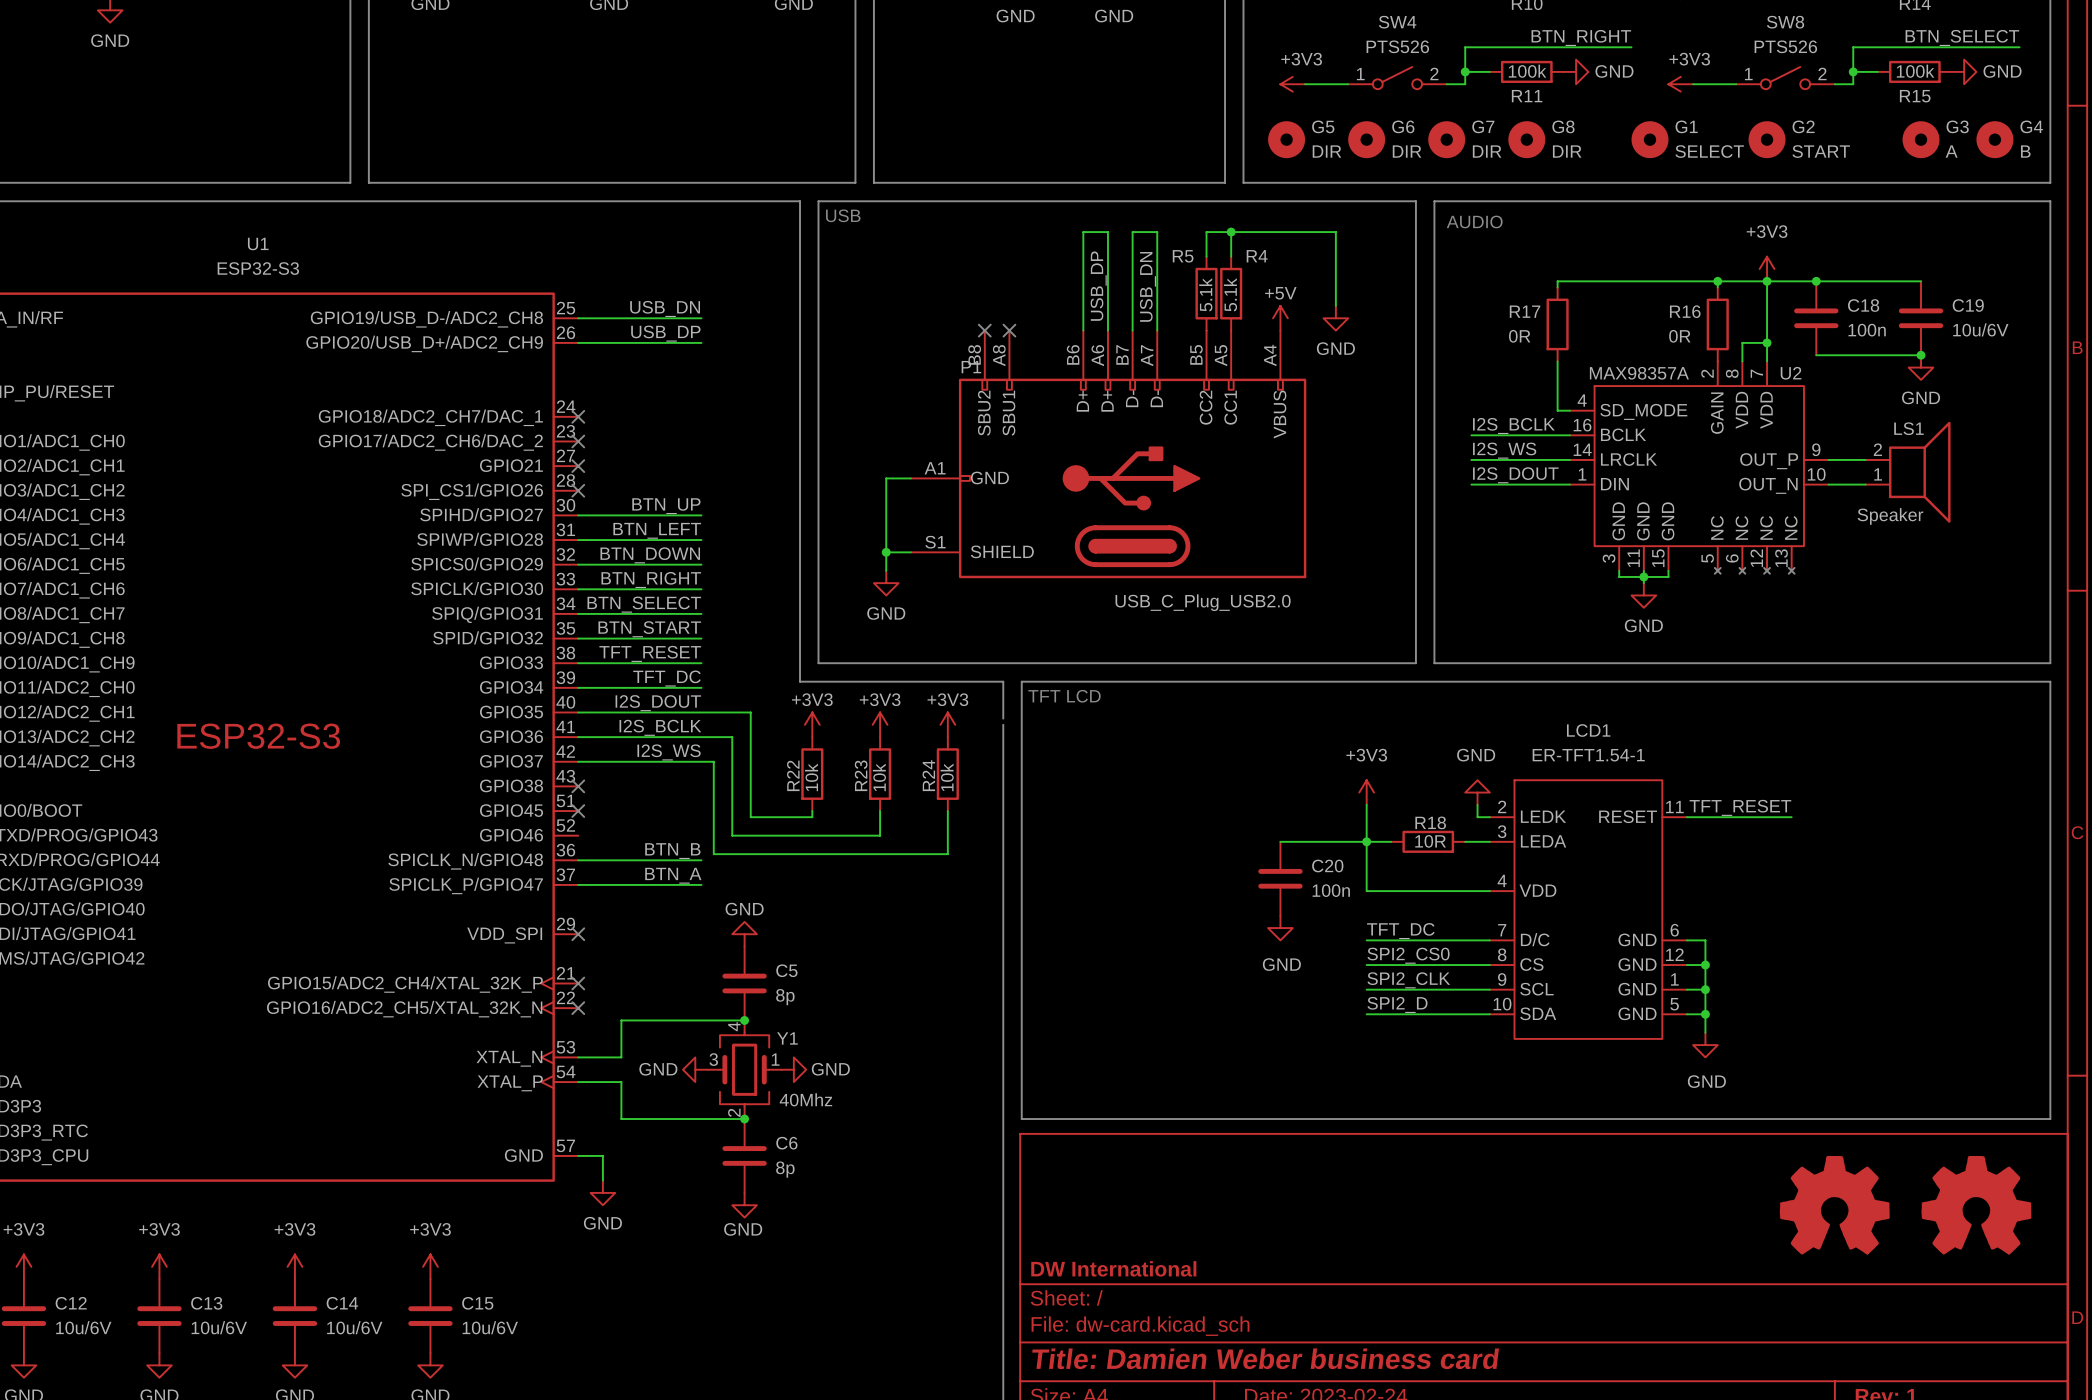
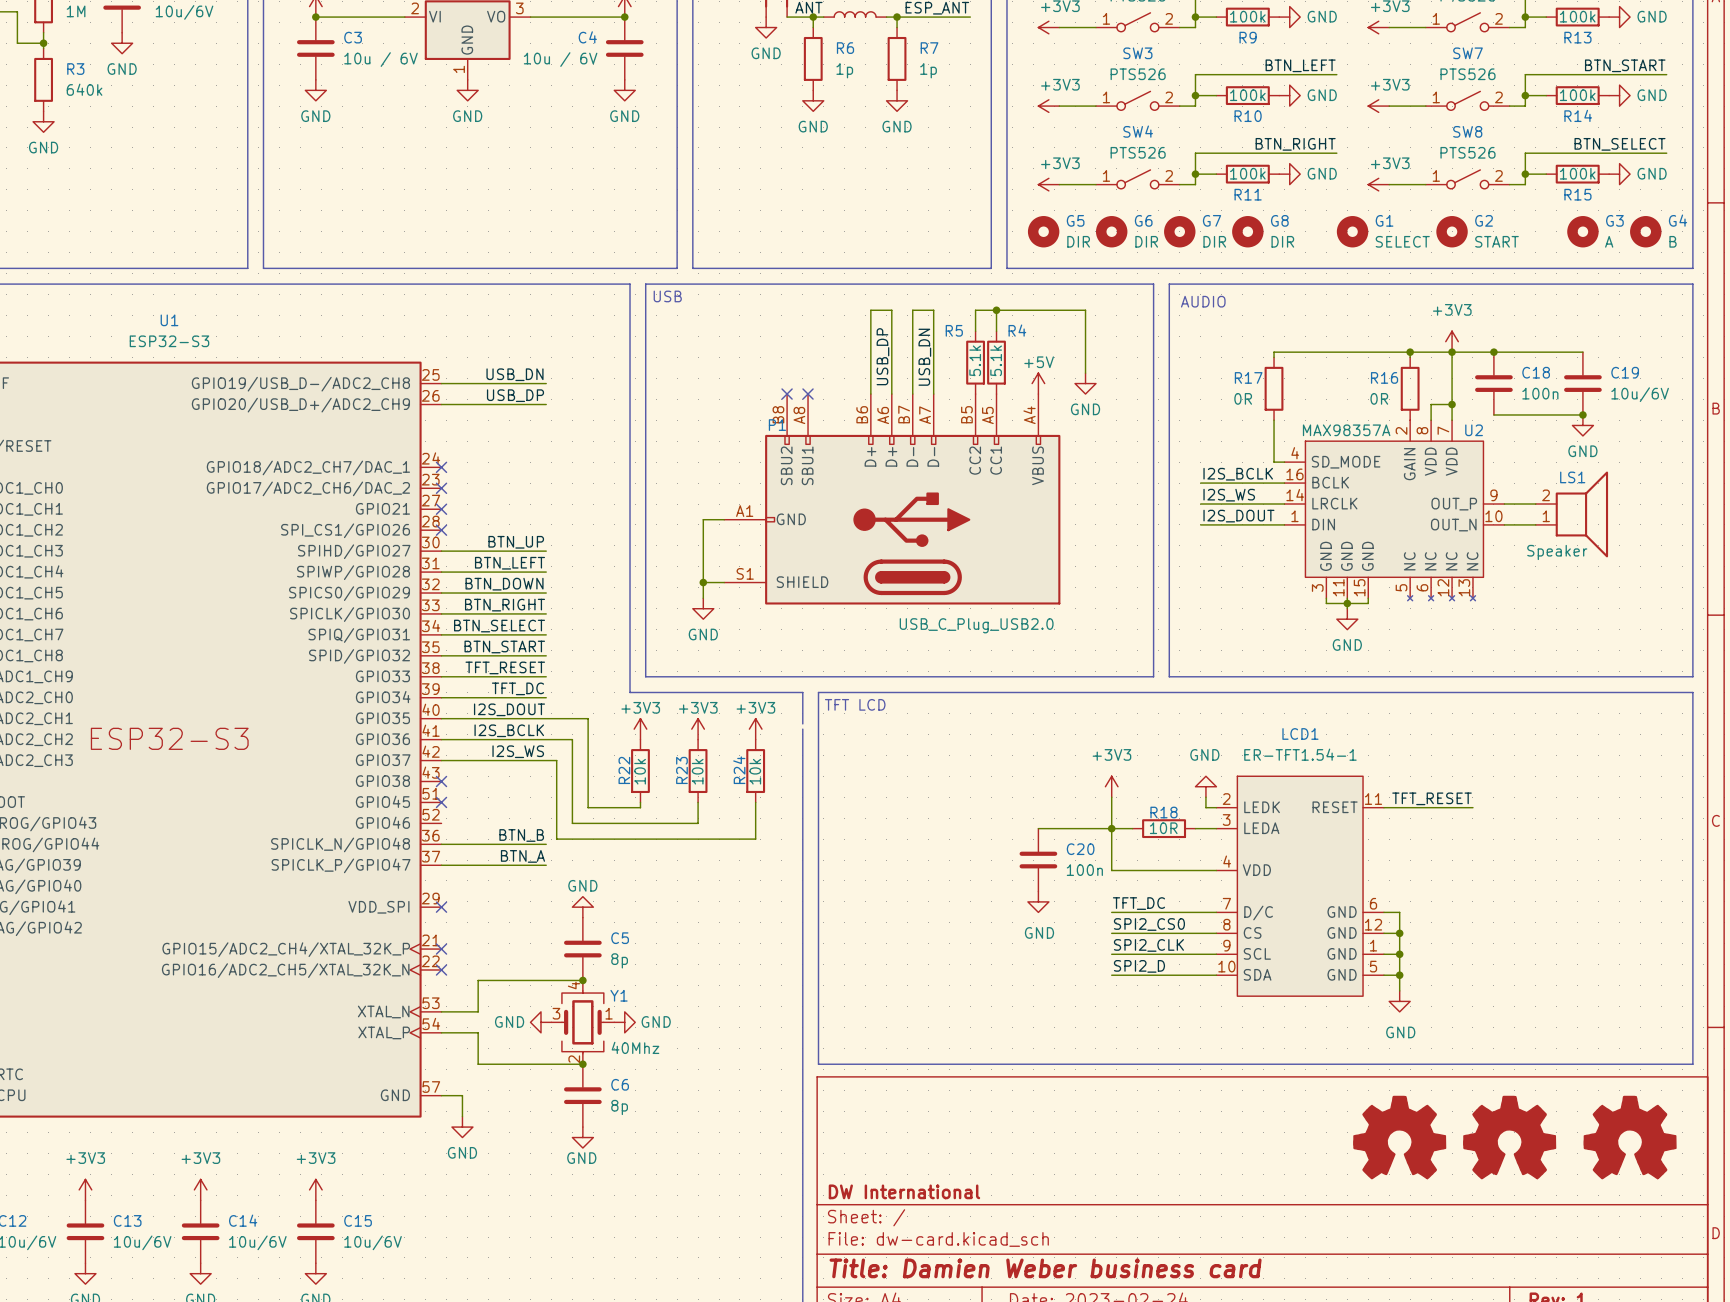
part: none -> (1399, 1137)

